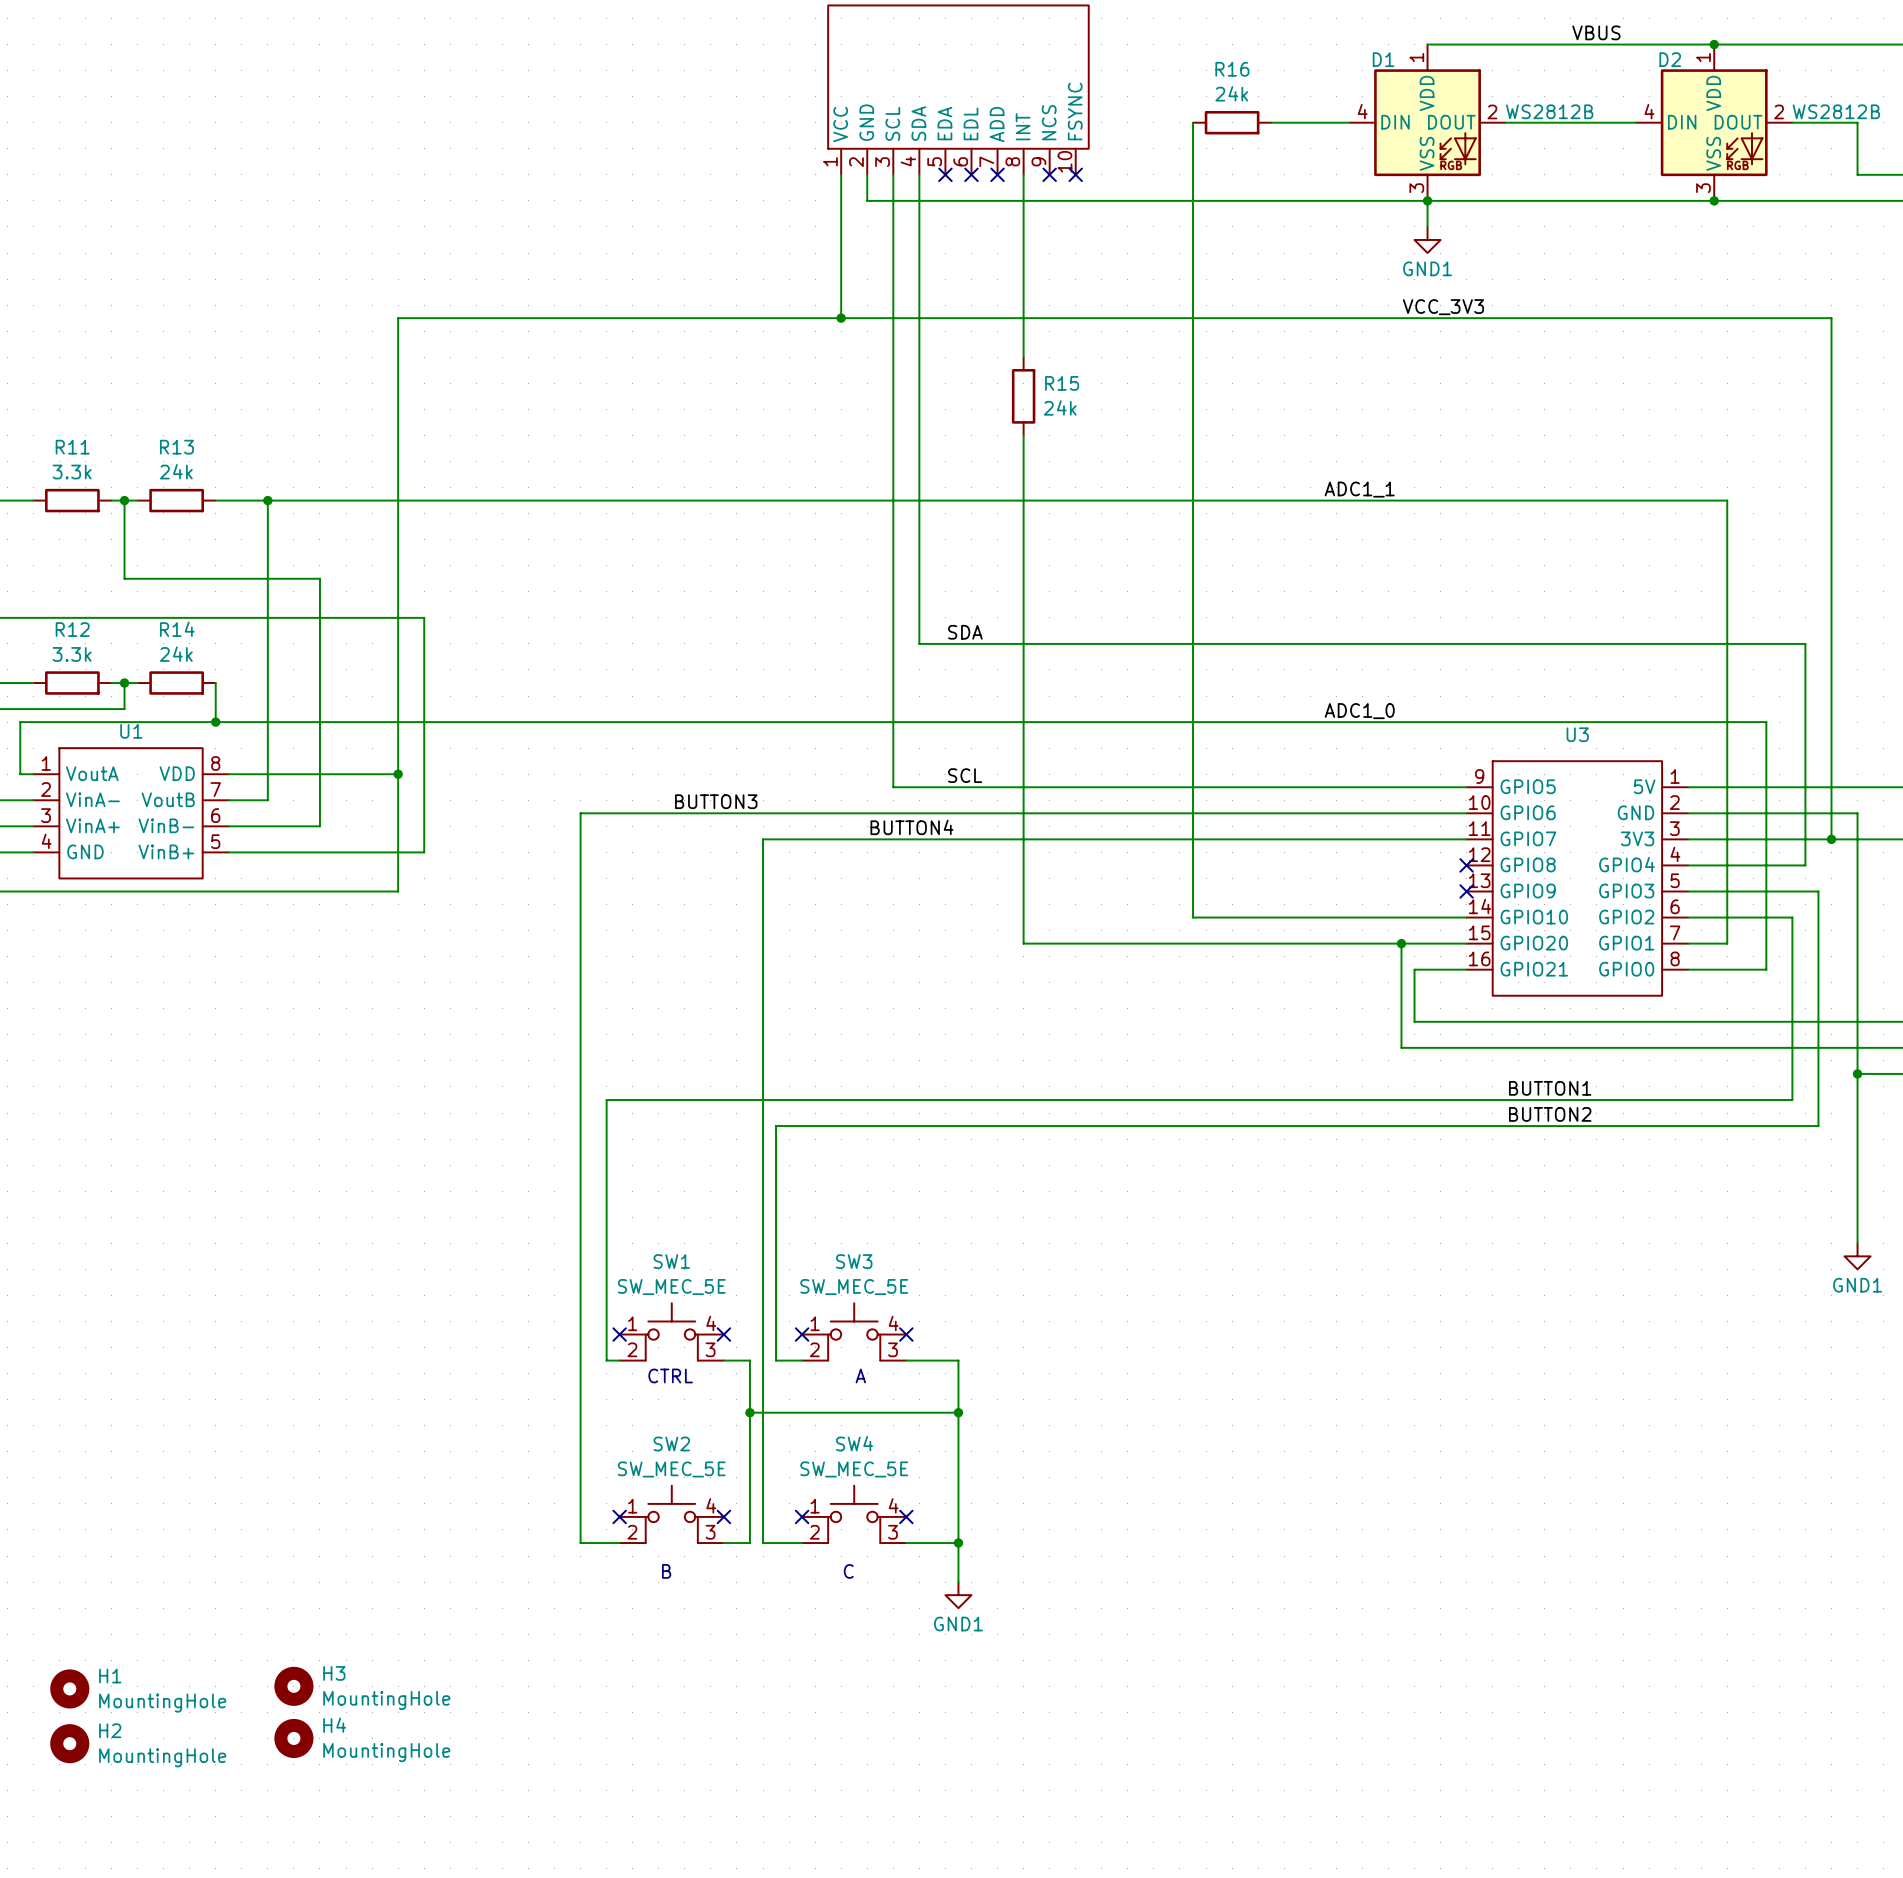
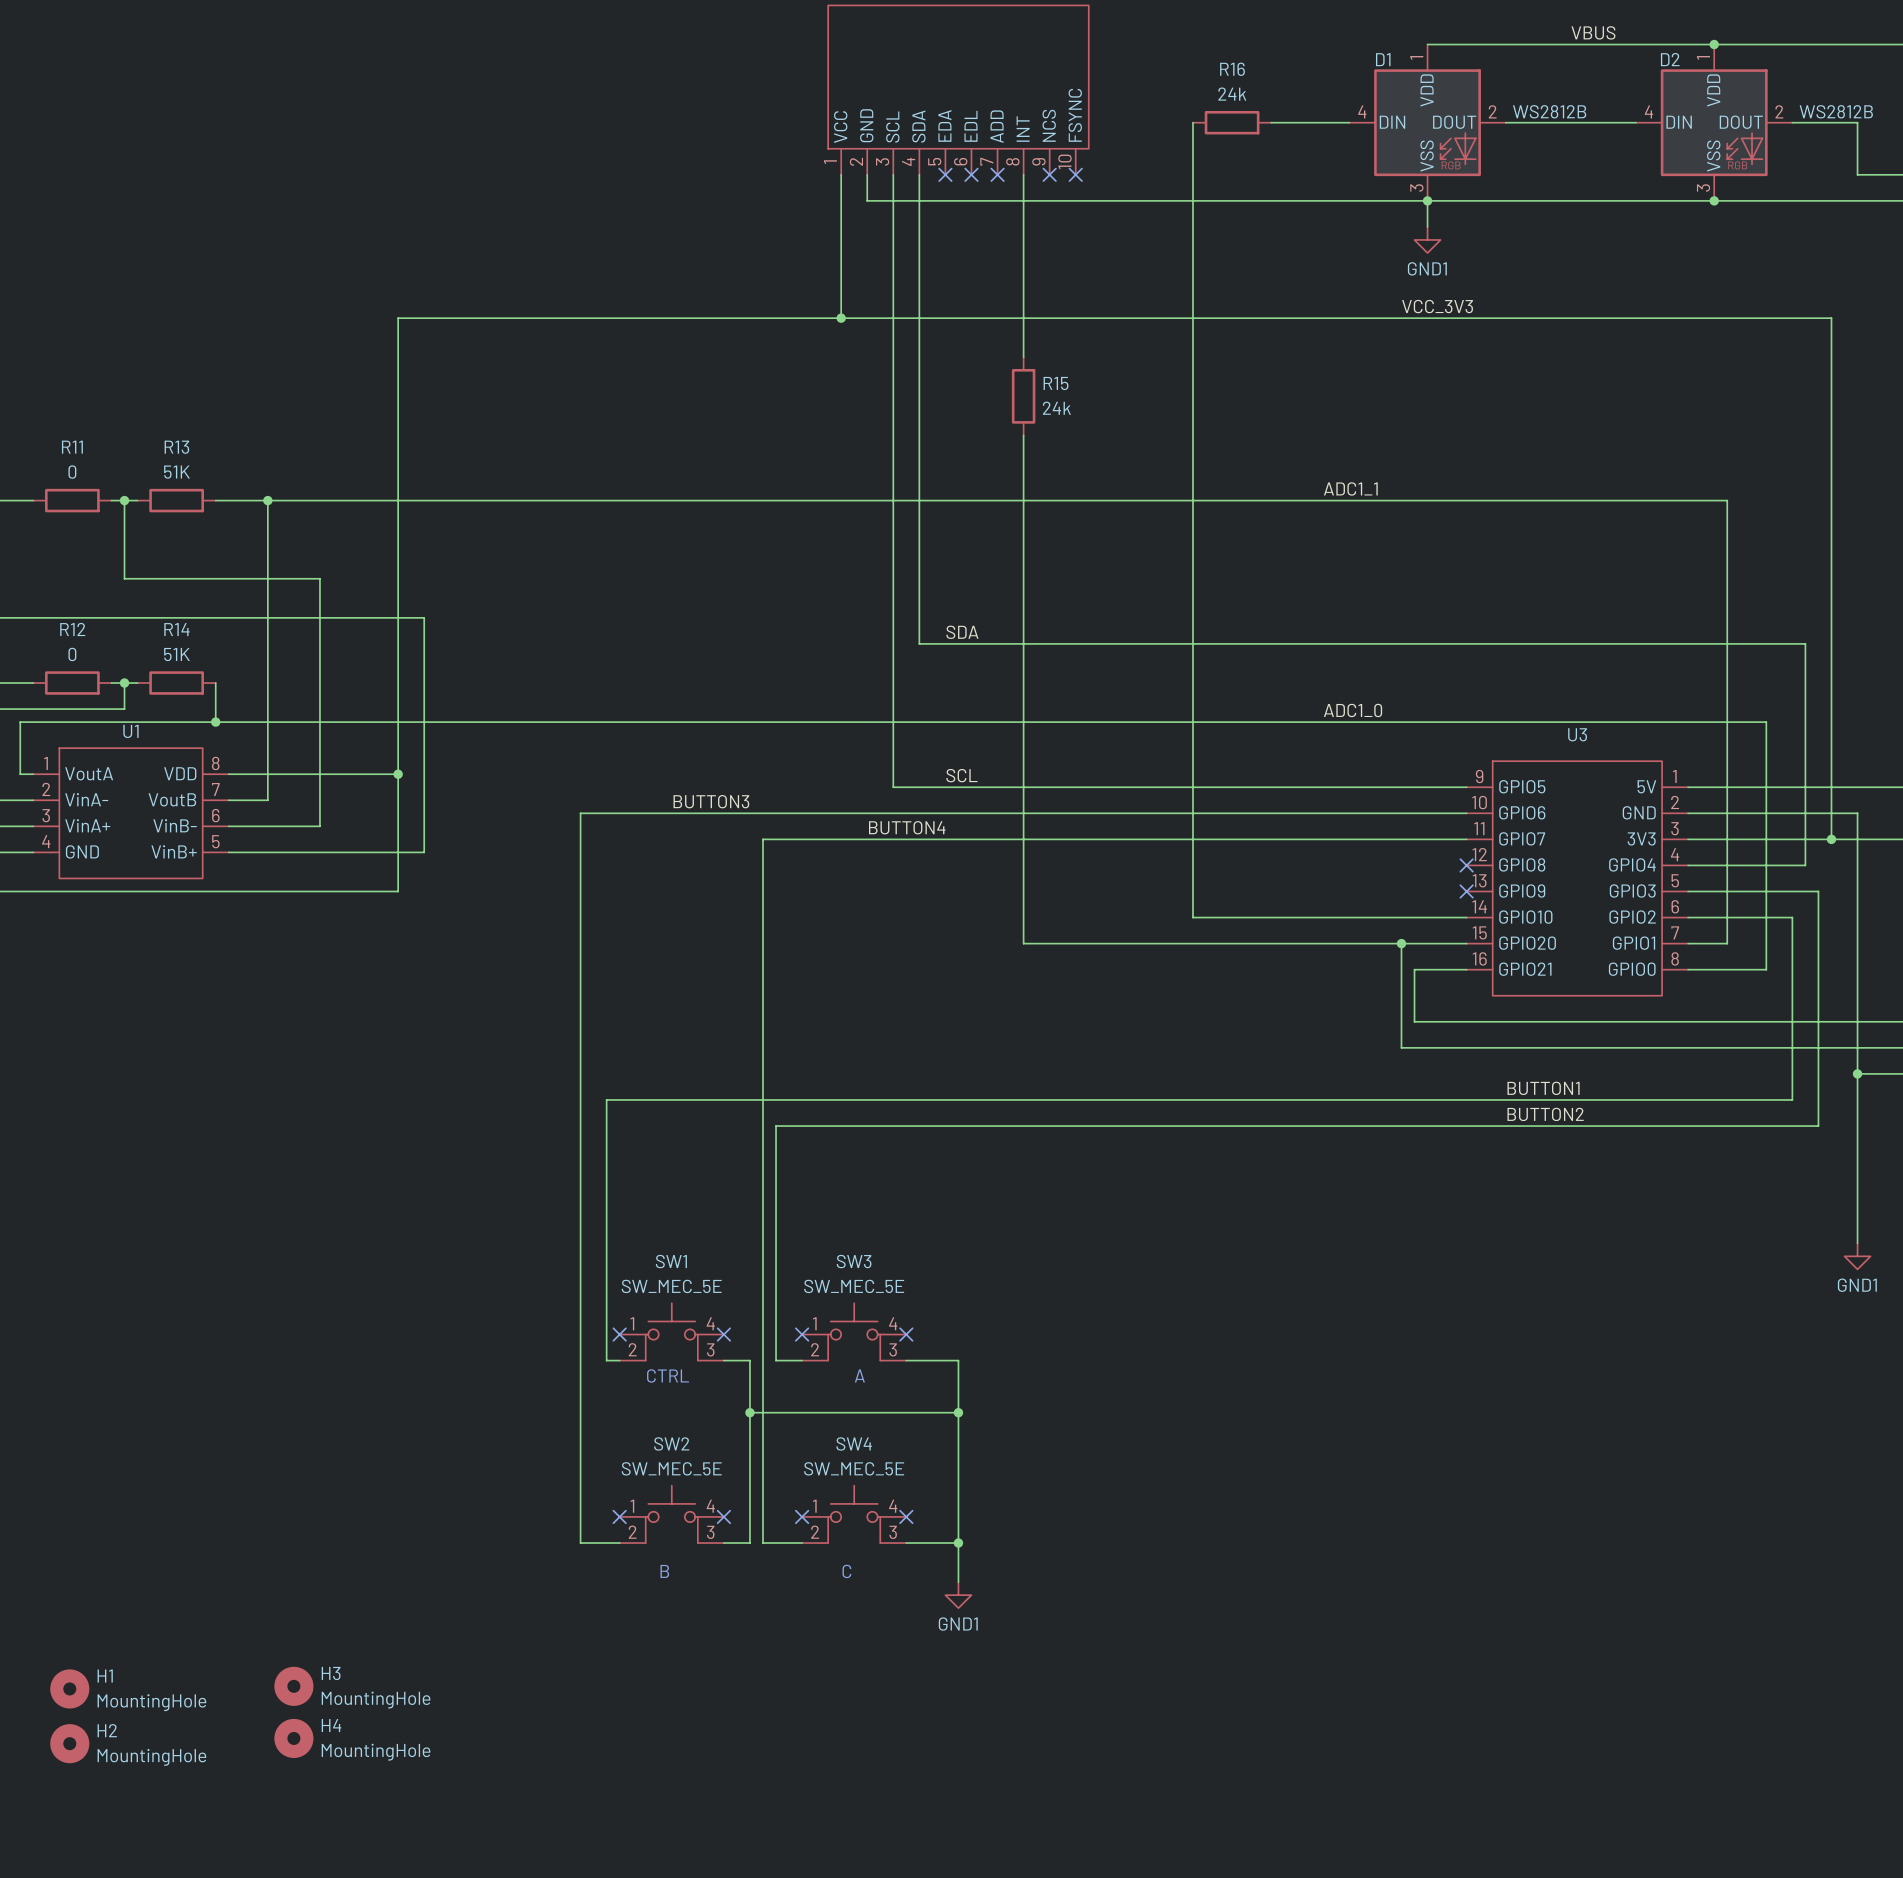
R13 value: 24k (176, 471) -> 51K (176, 472)
R11 value: 3.3k (72, 472) -> 0 (72, 472)
R12 value: 3.3k (72, 654) -> 0 (72, 654)
R14 value: 24k (176, 654) -> 51K (176, 654)

